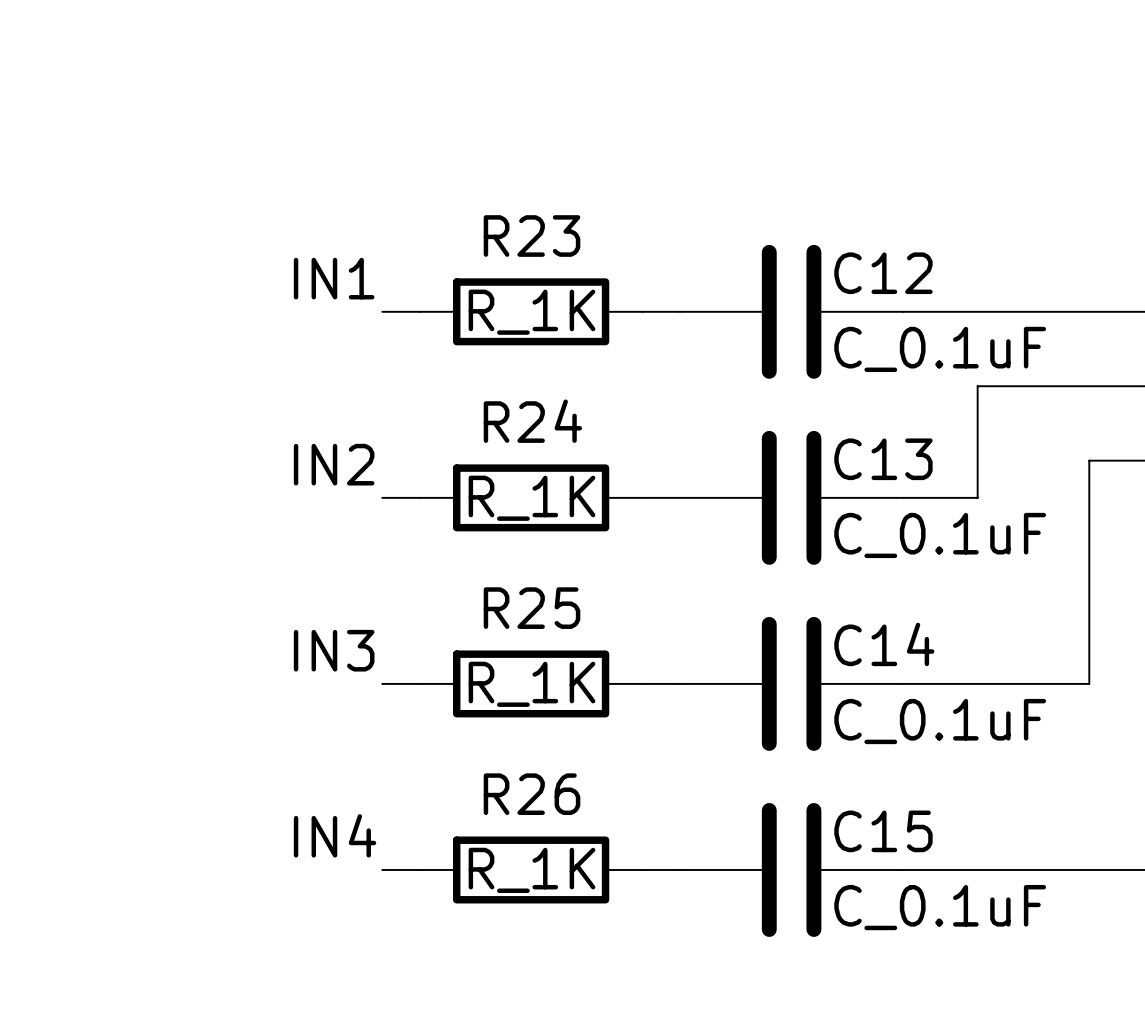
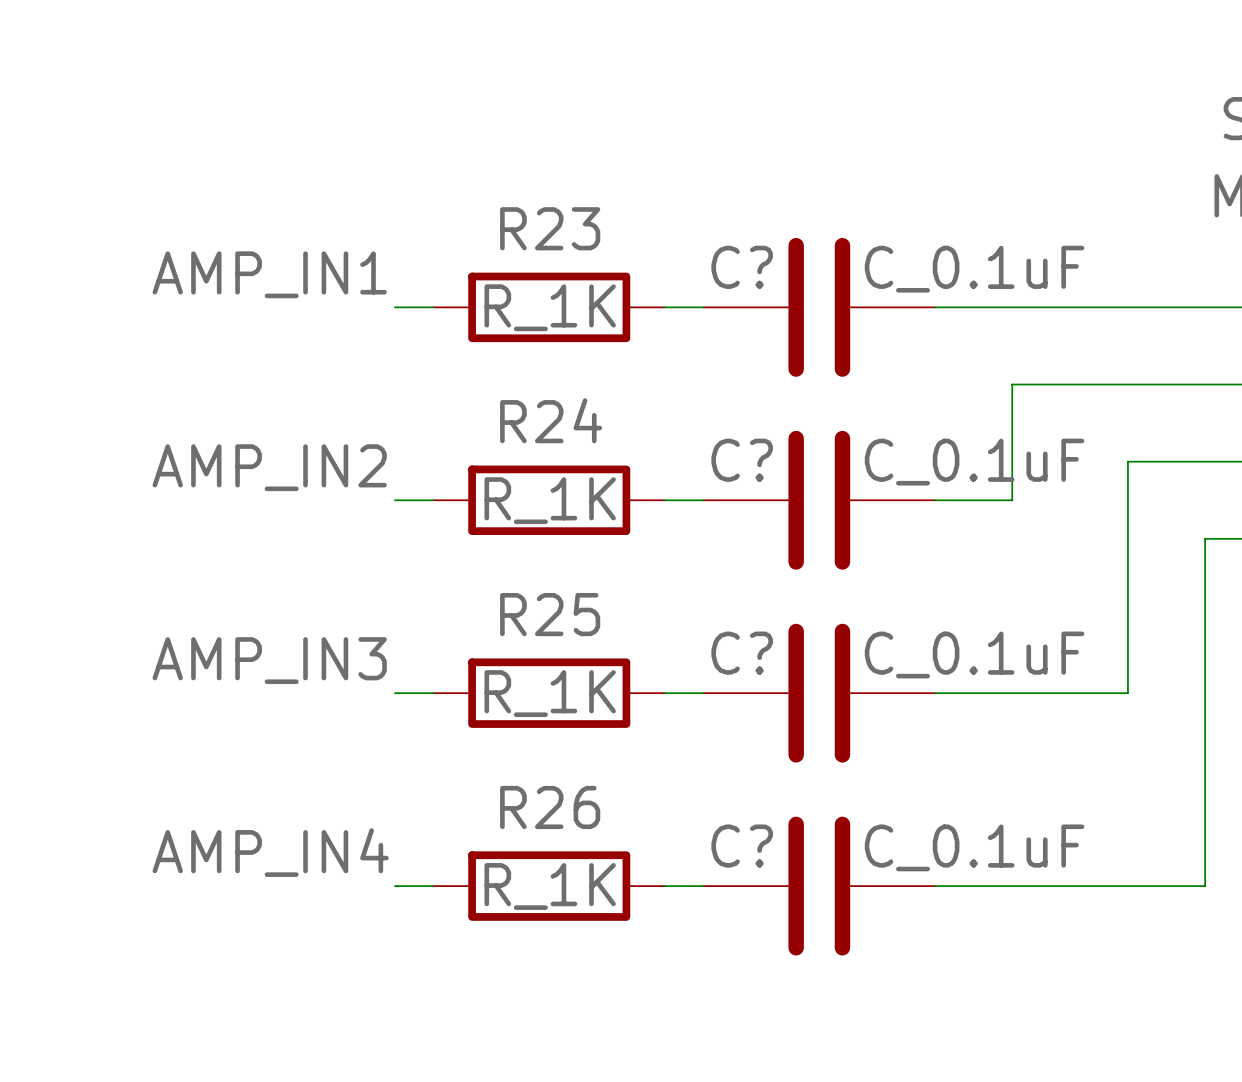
C12 name: C12 (883, 273) -> C? (742, 267)
label: IN1 (334, 278) -> AMP_IN1 (269, 274)
C12 value position: C_0.1uF (940, 349) -> C_0.1uF (974, 269)
C13 name: C13 (883, 459) -> C? (742, 460)
label: IN2 (334, 464) -> AMP_IN2 (269, 467)
C13 value position: C_0.1uF (940, 535) -> C_0.1uF (974, 462)
C14 name: C14 (884, 644) -> C? (742, 653)
label: IN3 (334, 650) -> AMP_IN3 (269, 660)
C14 value position: C_0.1uF (940, 721) -> C_0.1uF (974, 654)
C15 name: C15 (883, 831) -> C? (742, 846)
label: IN4 (335, 835) -> AMP_IN4 (270, 852)
C15 value position: C_0.1uF (940, 907) -> C_0.1uF (974, 847)

